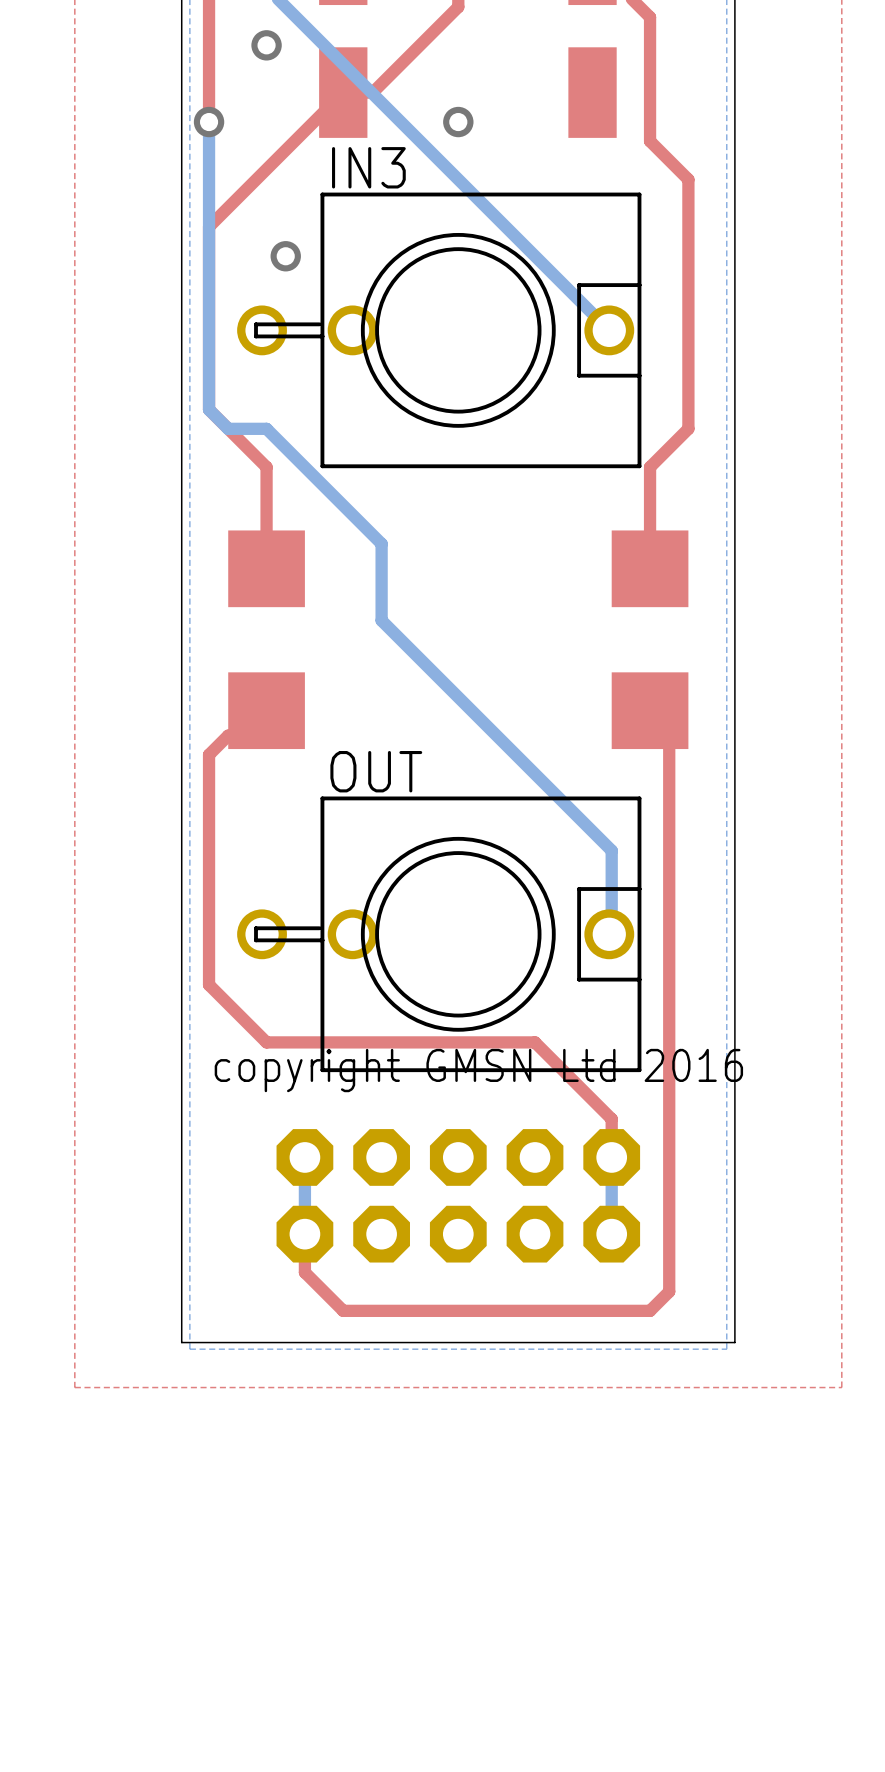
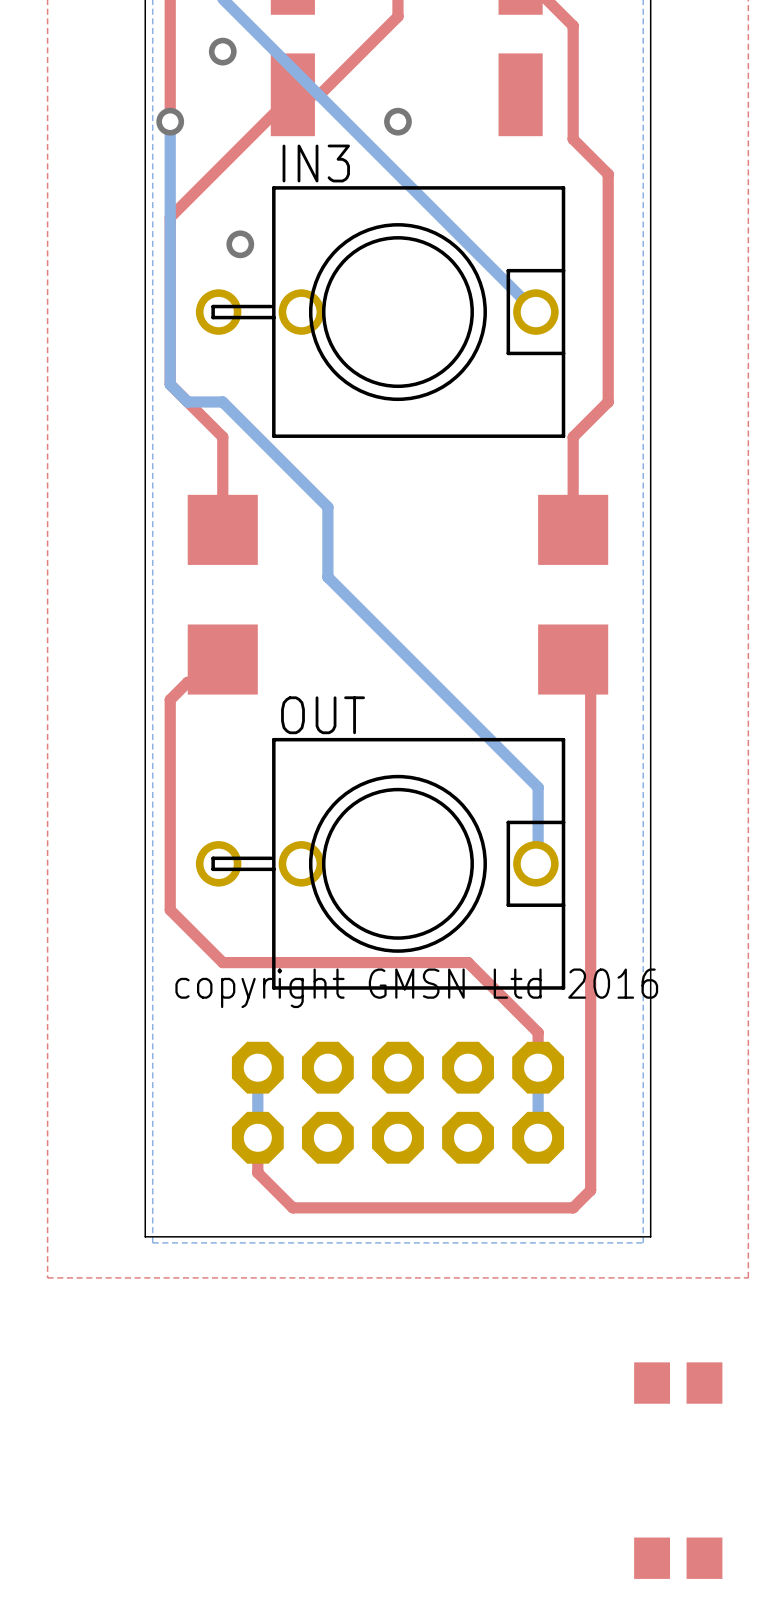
part: none -> (678, 1383)
part: none -> (678, 1558)

